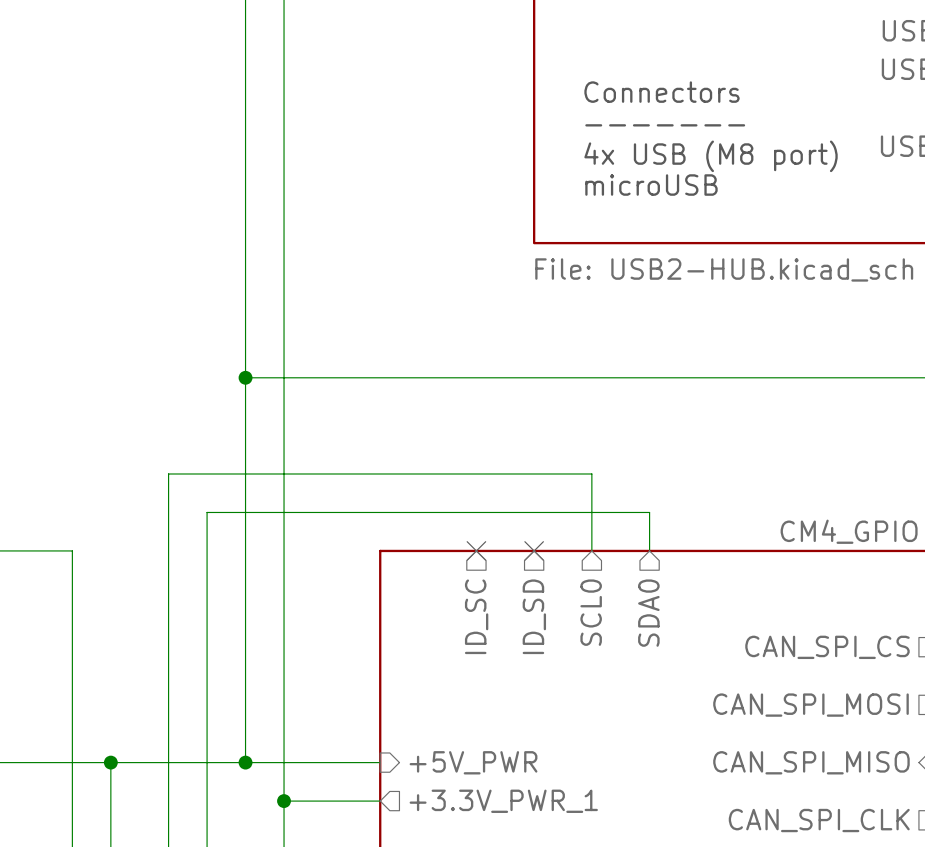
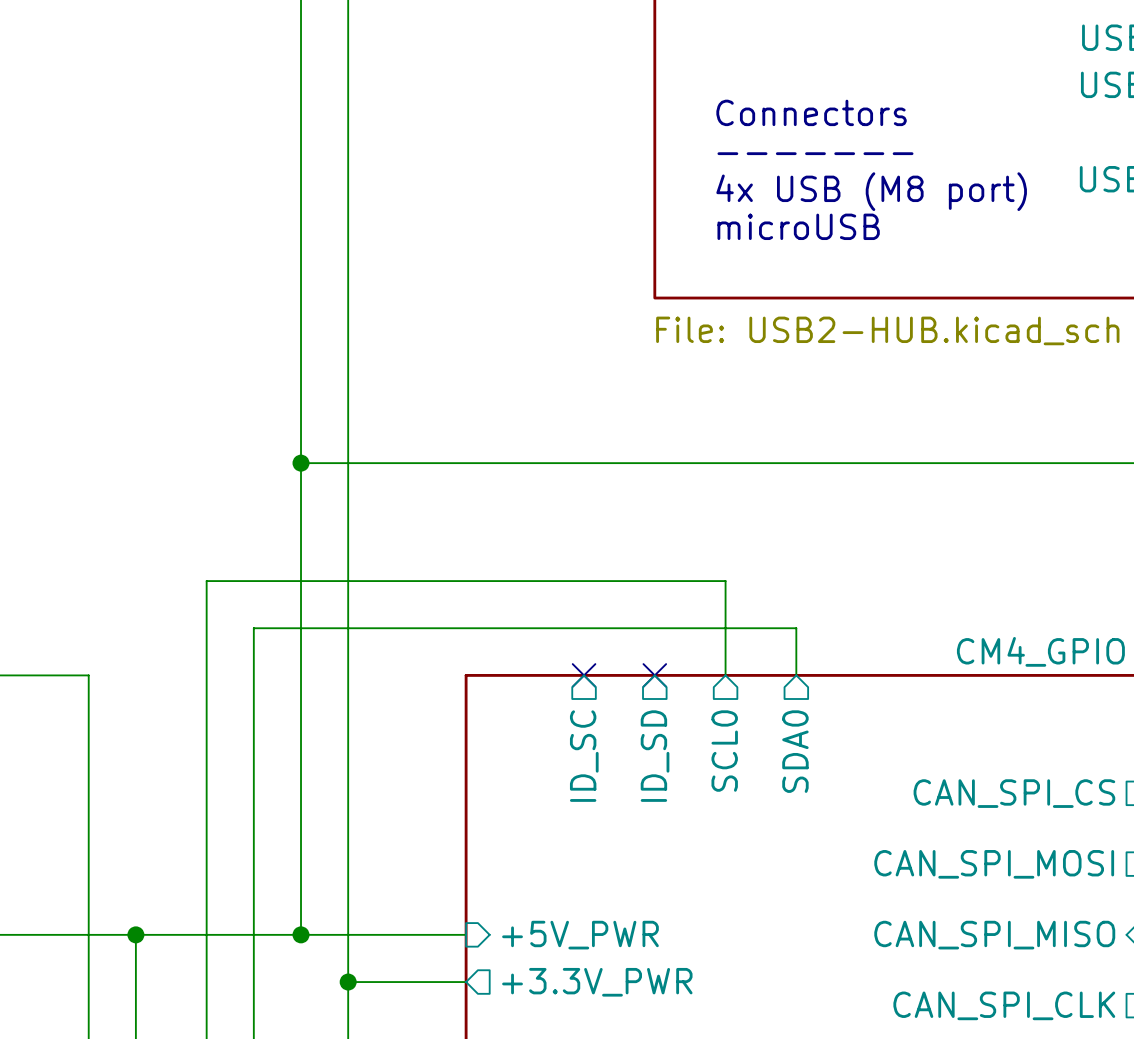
sheet pin: +3.3V_PWR_1 (503, 801) -> +3.3V_PWR (597, 982)

